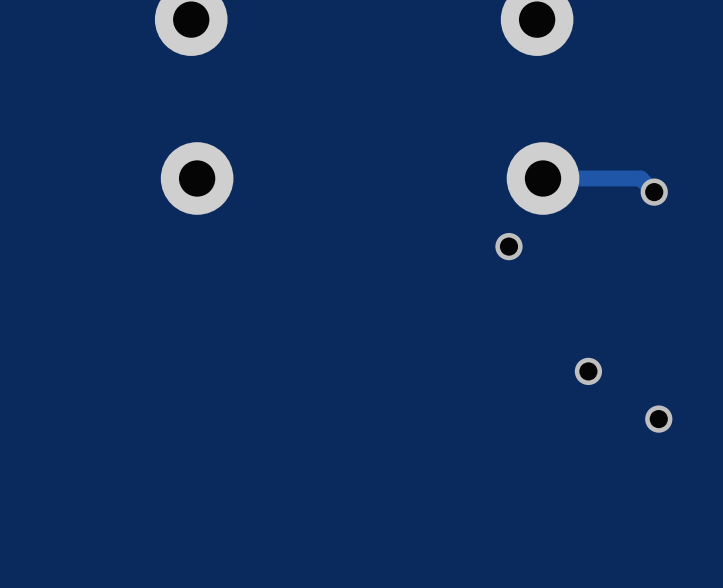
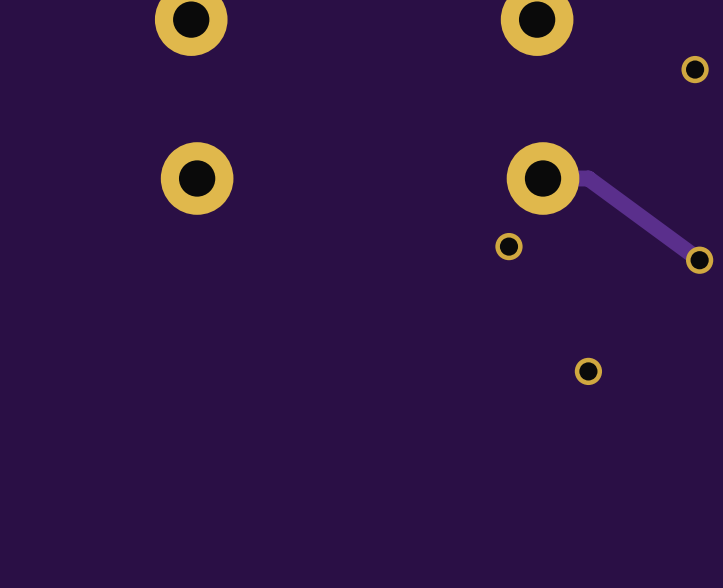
via: none -> (695, 69)
track: (588, 178) (640, 178) (654, 192) -> (588, 178) (699, 260)
via: (654, 192) -> none
via: none -> (699, 260)
via: (658, 419) -> none

